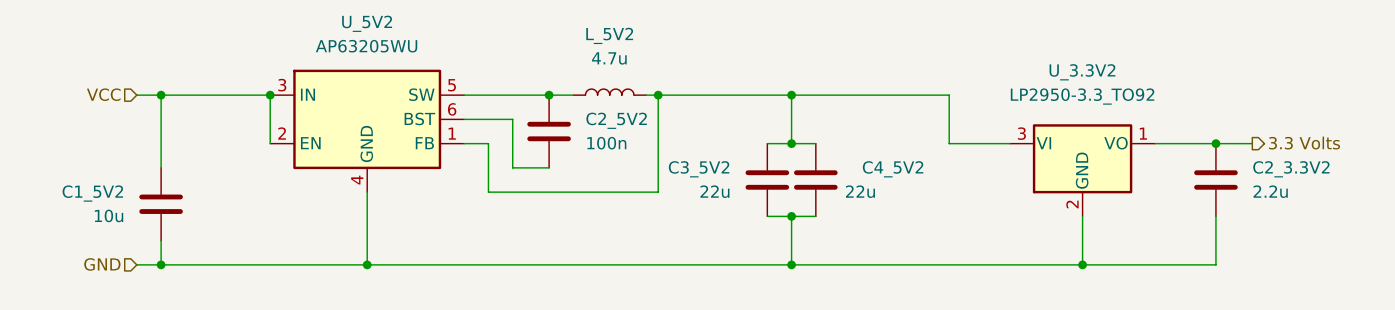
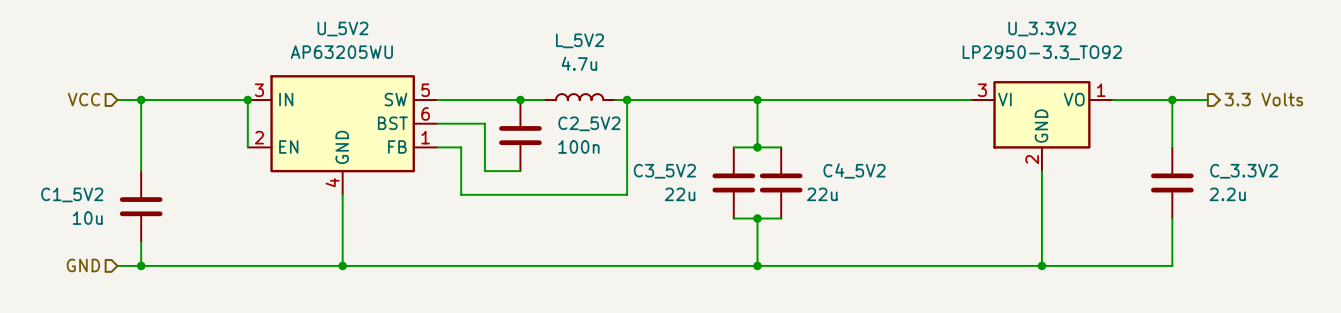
wire: (949, 95) (949, 143) (1009, 143) -> (911, 100) (970, 100)
wire: none -> (1172, 100) (1172, 147)
wire: (1155, 143) (1252, 143) -> (1113, 100) (1207, 100)
junction position: (1215, 143) -> (1172, 100)
hierarchical label position: 3.3 Volts (1304, 143) -> 3.3 Volts (1263, 99)
C2_3.3V2 name: C2_3.3V2 (1291, 169) -> C_3.3V2 (1244, 171)
U_3.3V2 position: (1082, 170) -> (1041, 126)

